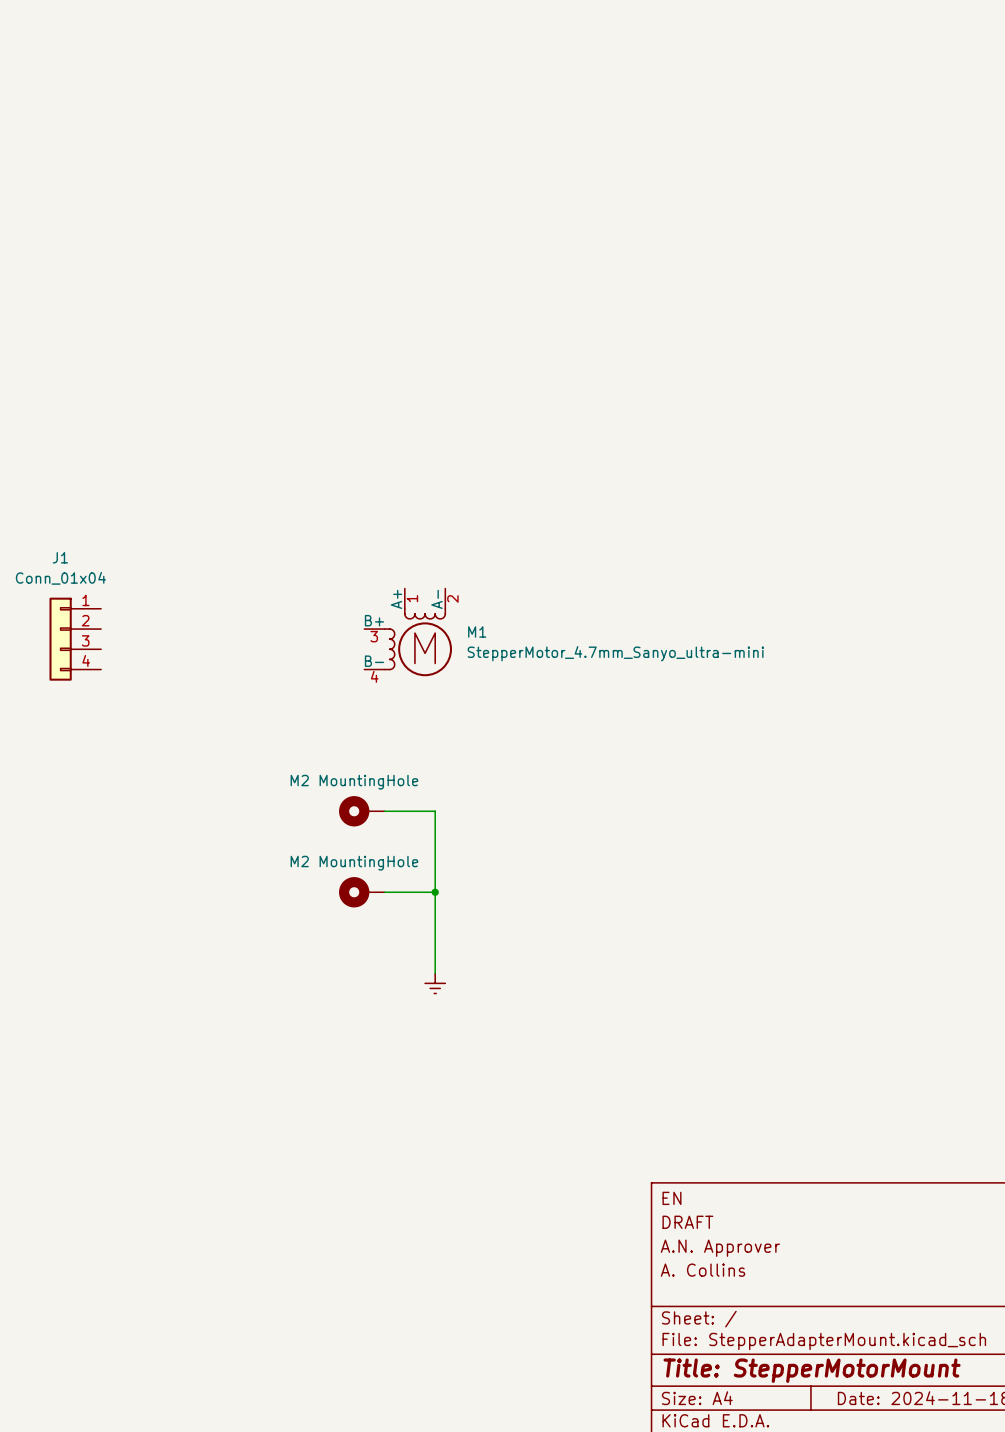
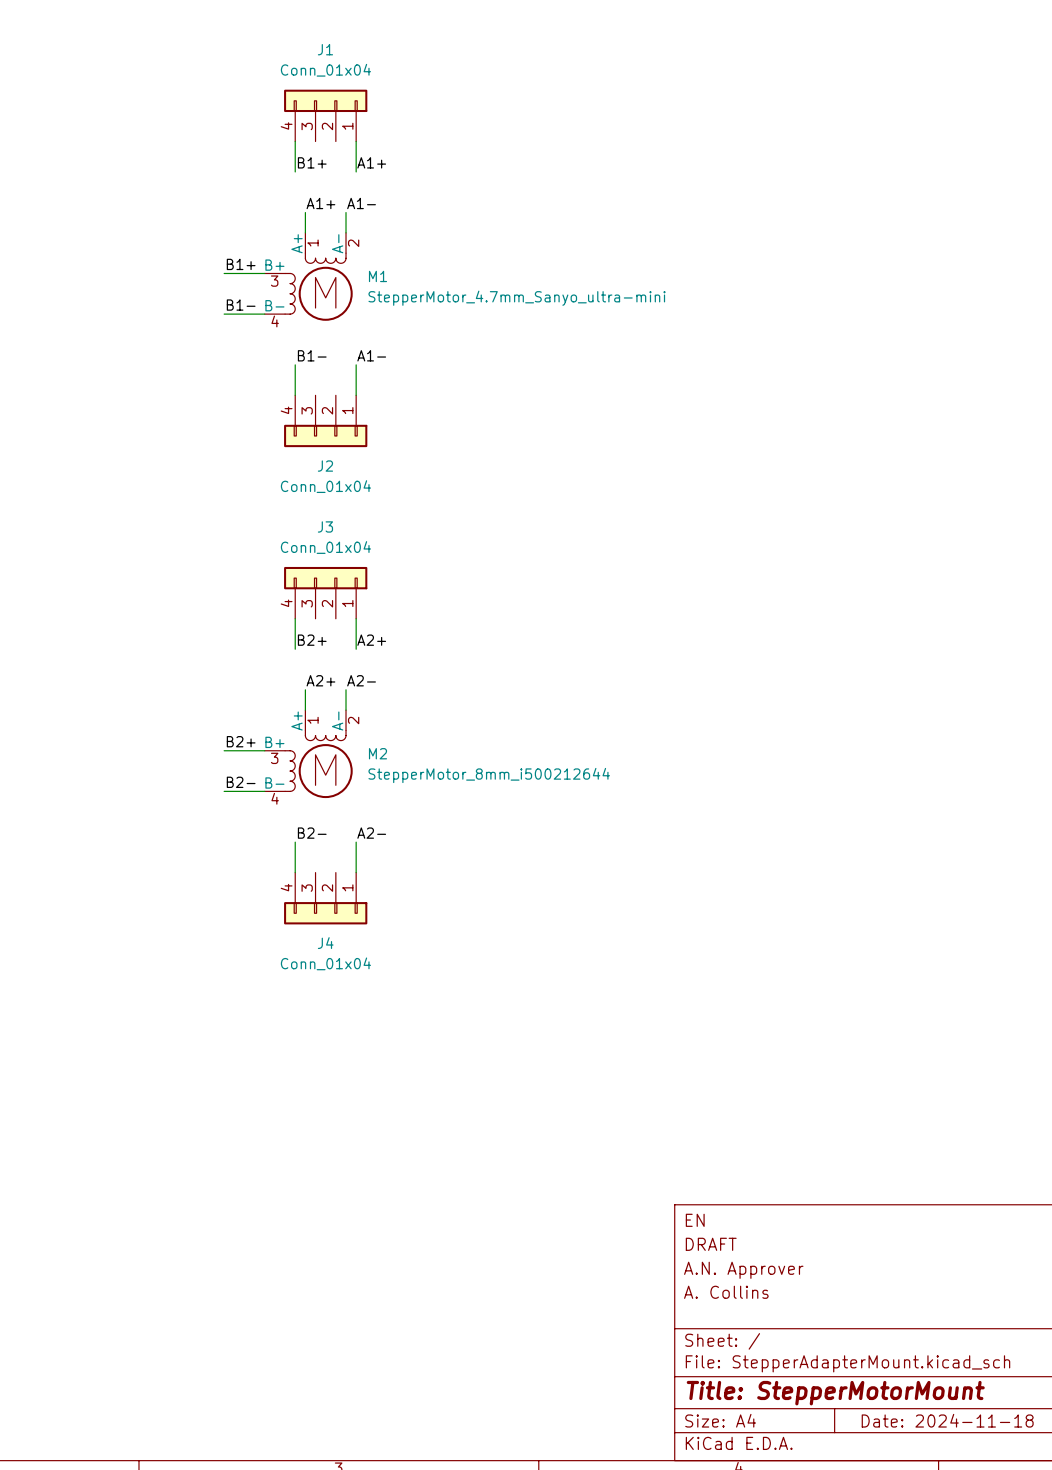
wire: none -> (295, 141) (295, 171)
wire: none -> (356, 141) (356, 171)
label: none -> B1+ (312, 162)
label: none -> A1+ (371, 162)
label: none -> A1+ (320, 203)
label: none -> A1- (361, 203)
wire: none -> (305, 212) (305, 232)
wire: none -> (346, 212) (346, 232)
label: none -> B1+ (241, 264)
wire: none -> (224, 273) (264, 273)
label: none -> B1- (241, 305)
wire: none -> (224, 314) (264, 314)
label: none -> B1- (312, 355)
label: none -> A1- (371, 355)
wire: none -> (295, 364) (295, 395)
wire: none -> (356, 364) (356, 395)
J2: none -> Conn_01x04 (325, 421)
J1 name position: J1 (60, 557) -> J1 (325, 49)
J3: none -> Conn_01x04 (325, 592)
J1 value position: Conn_01x04 (60, 578) -> Conn_01x04 (325, 70)
wire: none -> (295, 618) (295, 649)
wire: none -> (356, 618) (356, 649)
label: none -> B2+ (312, 640)
label: none -> A2+ (371, 640)
M1 position: (408, 632) -> (308, 276)
J1 rotation: 0° (60, 639) -> 90° clockwise (325, 100)
J1 position: (75, 639) -> (325, 115)
label: none -> A2+ (320, 680)
label: none -> A2- (361, 680)
wire: none -> (305, 689) (305, 710)
wire: none -> (346, 689) (346, 710)
label: none -> B2+ (241, 741)
wire: none -> (224, 750) (264, 750)
M2: none -> StepperMotor_8mm_i500212644 (308, 754)
label: none -> B2- (241, 782)
wire: none -> (224, 791) (264, 791)
part: M2 MountingHole (361, 811) -> none
wire: (384, 811) (435, 811) (435, 973) -> none
label: none -> B2- (312, 833)
label: none -> A2- (371, 833)
wire: none -> (295, 842) (295, 872)
wire: none -> (356, 842) (356, 872)
J4: none -> Conn_01x04 (325, 898)
part: M2 MountingHole (361, 892) -> none
wire: (384, 892) (435, 892) -> none
junction: (435, 892) -> none
power symbol: (435, 983) -> none

